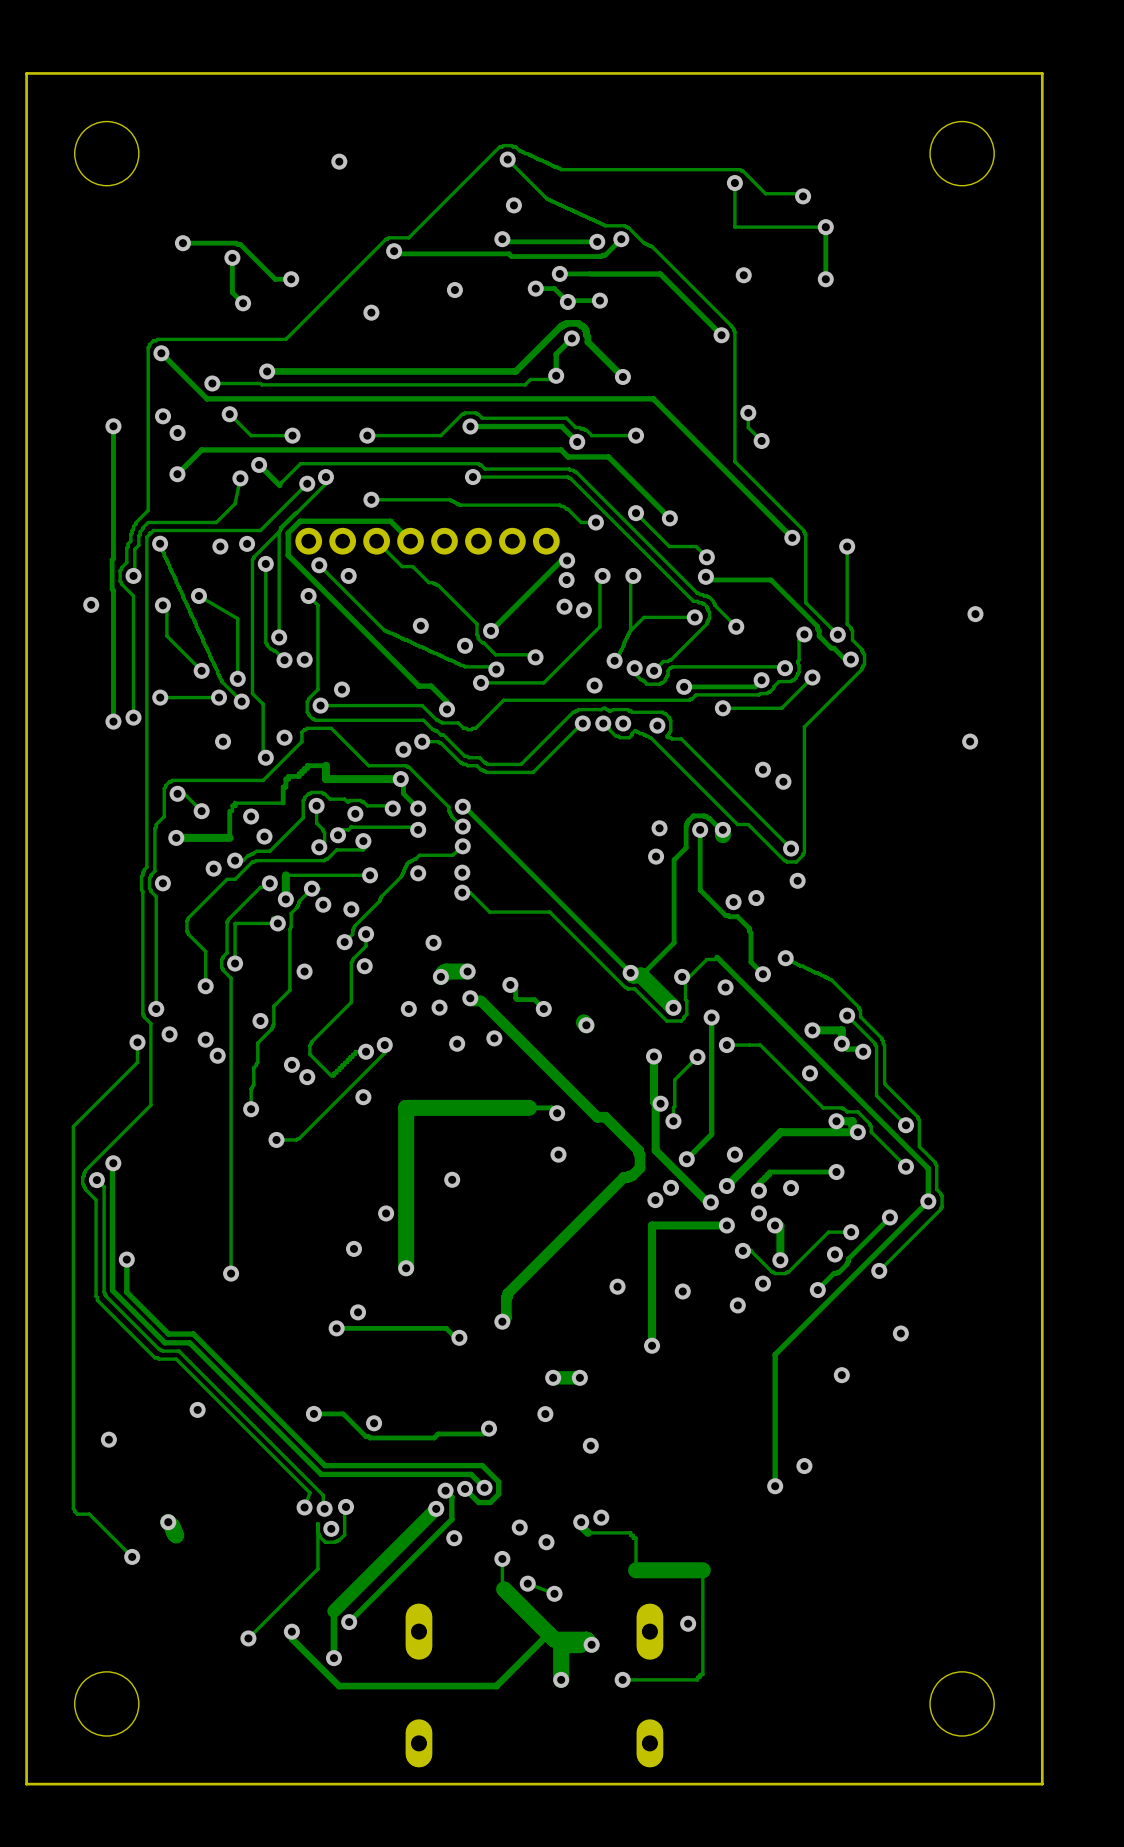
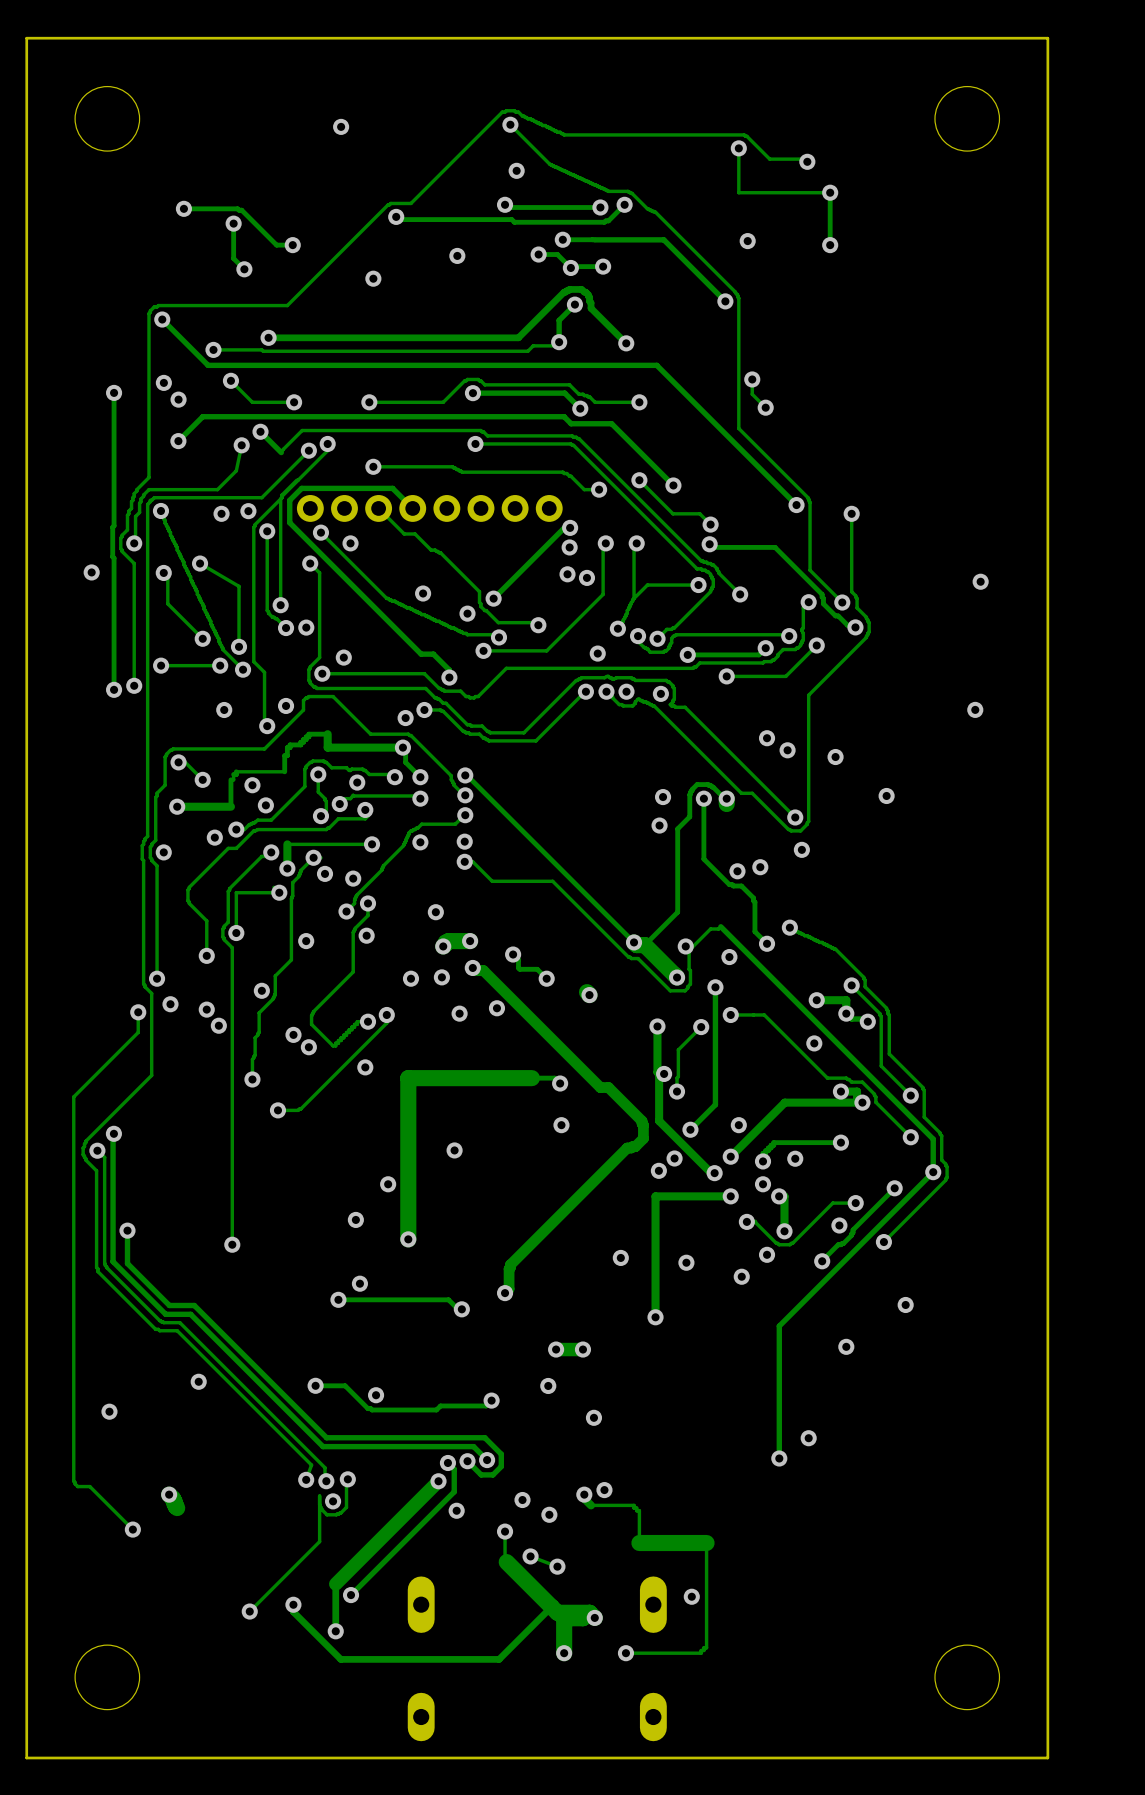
via: none -> (835, 757)
via: none -> (886, 795)

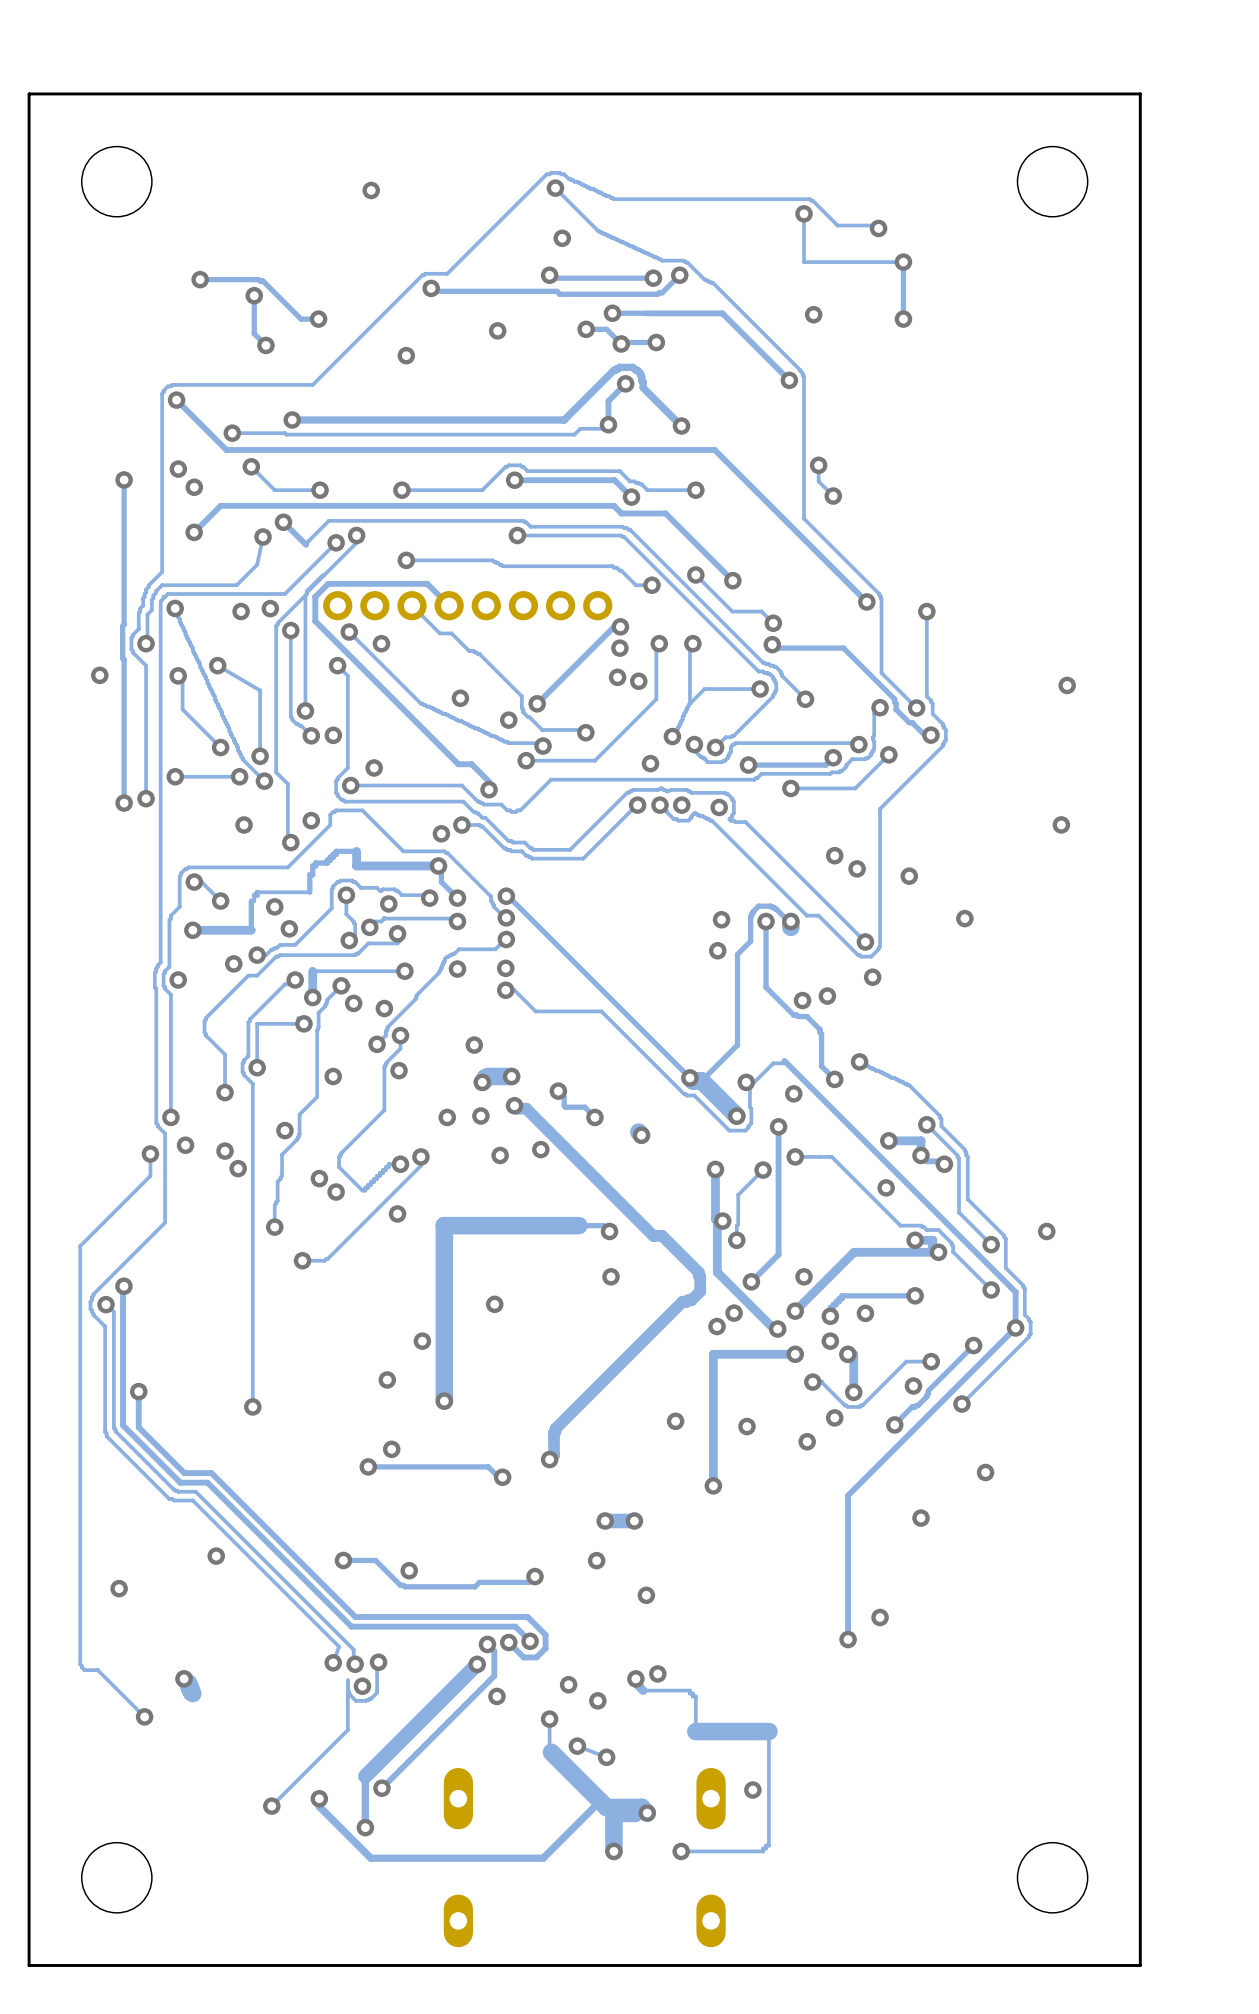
via: none -> (1046, 1231)

